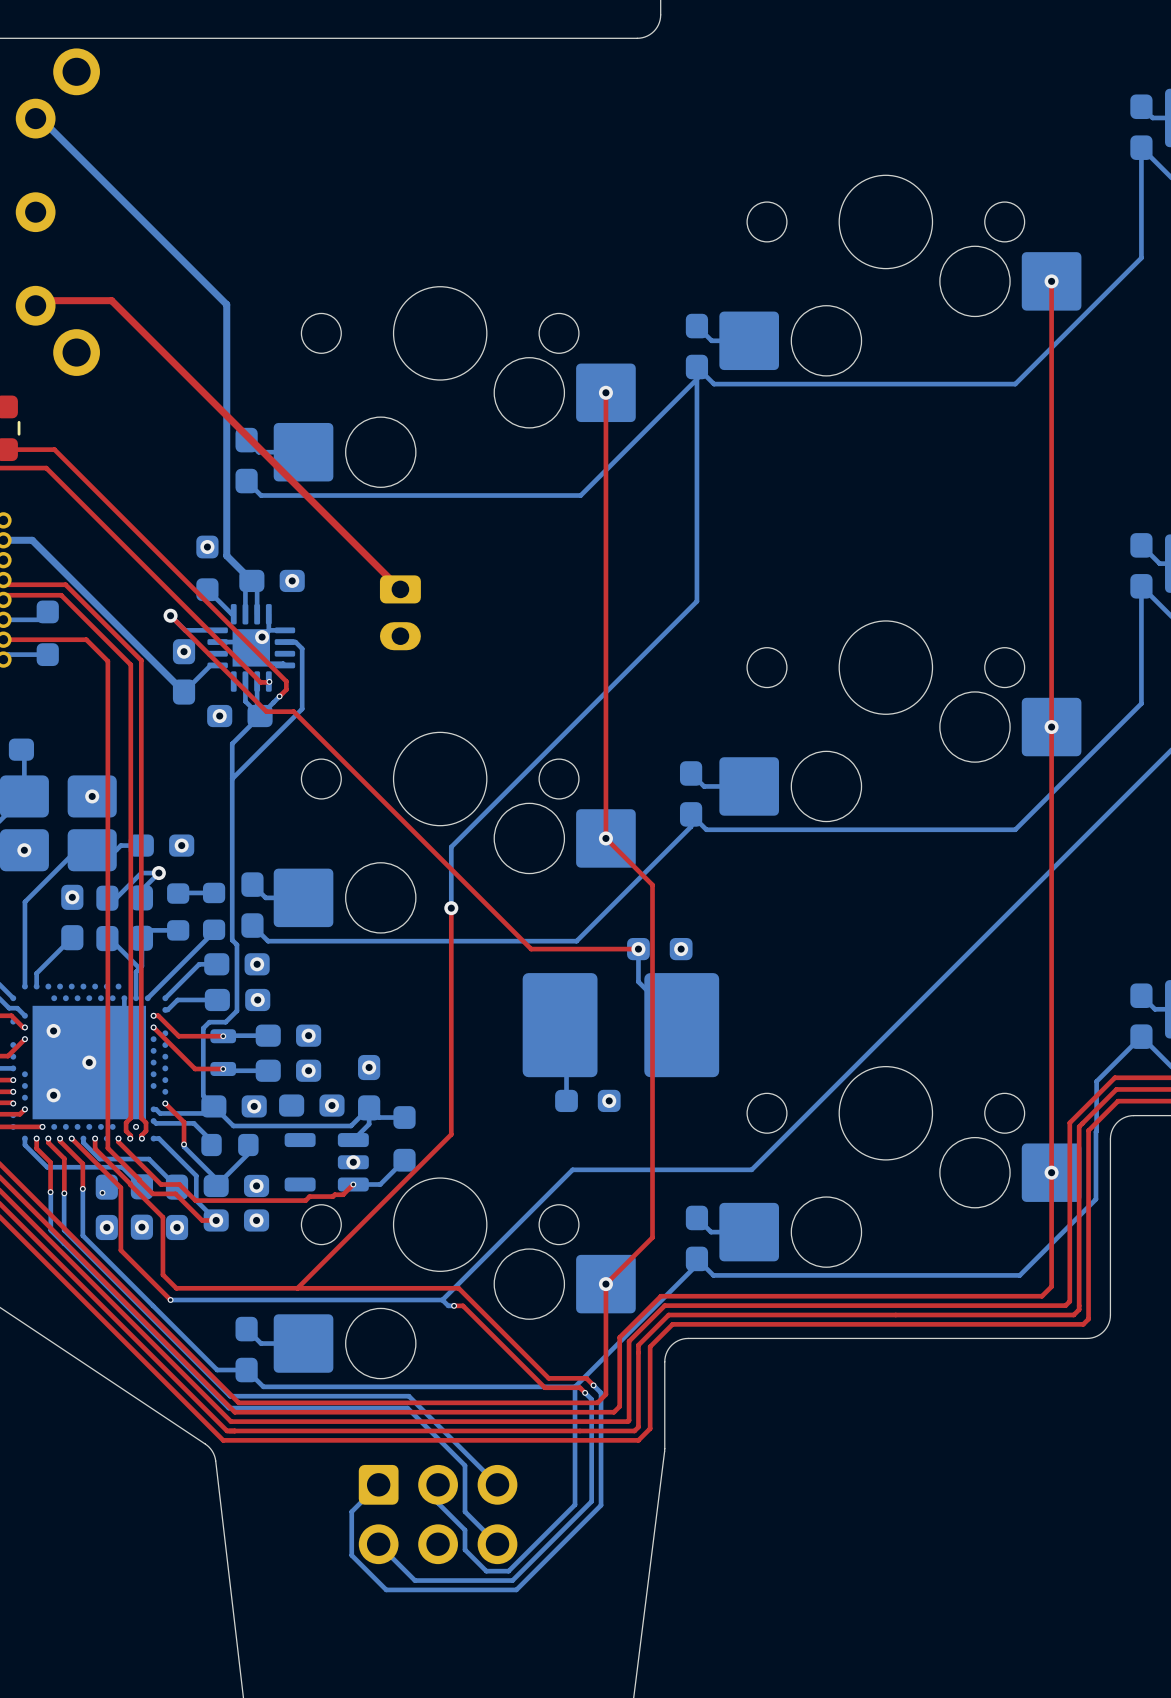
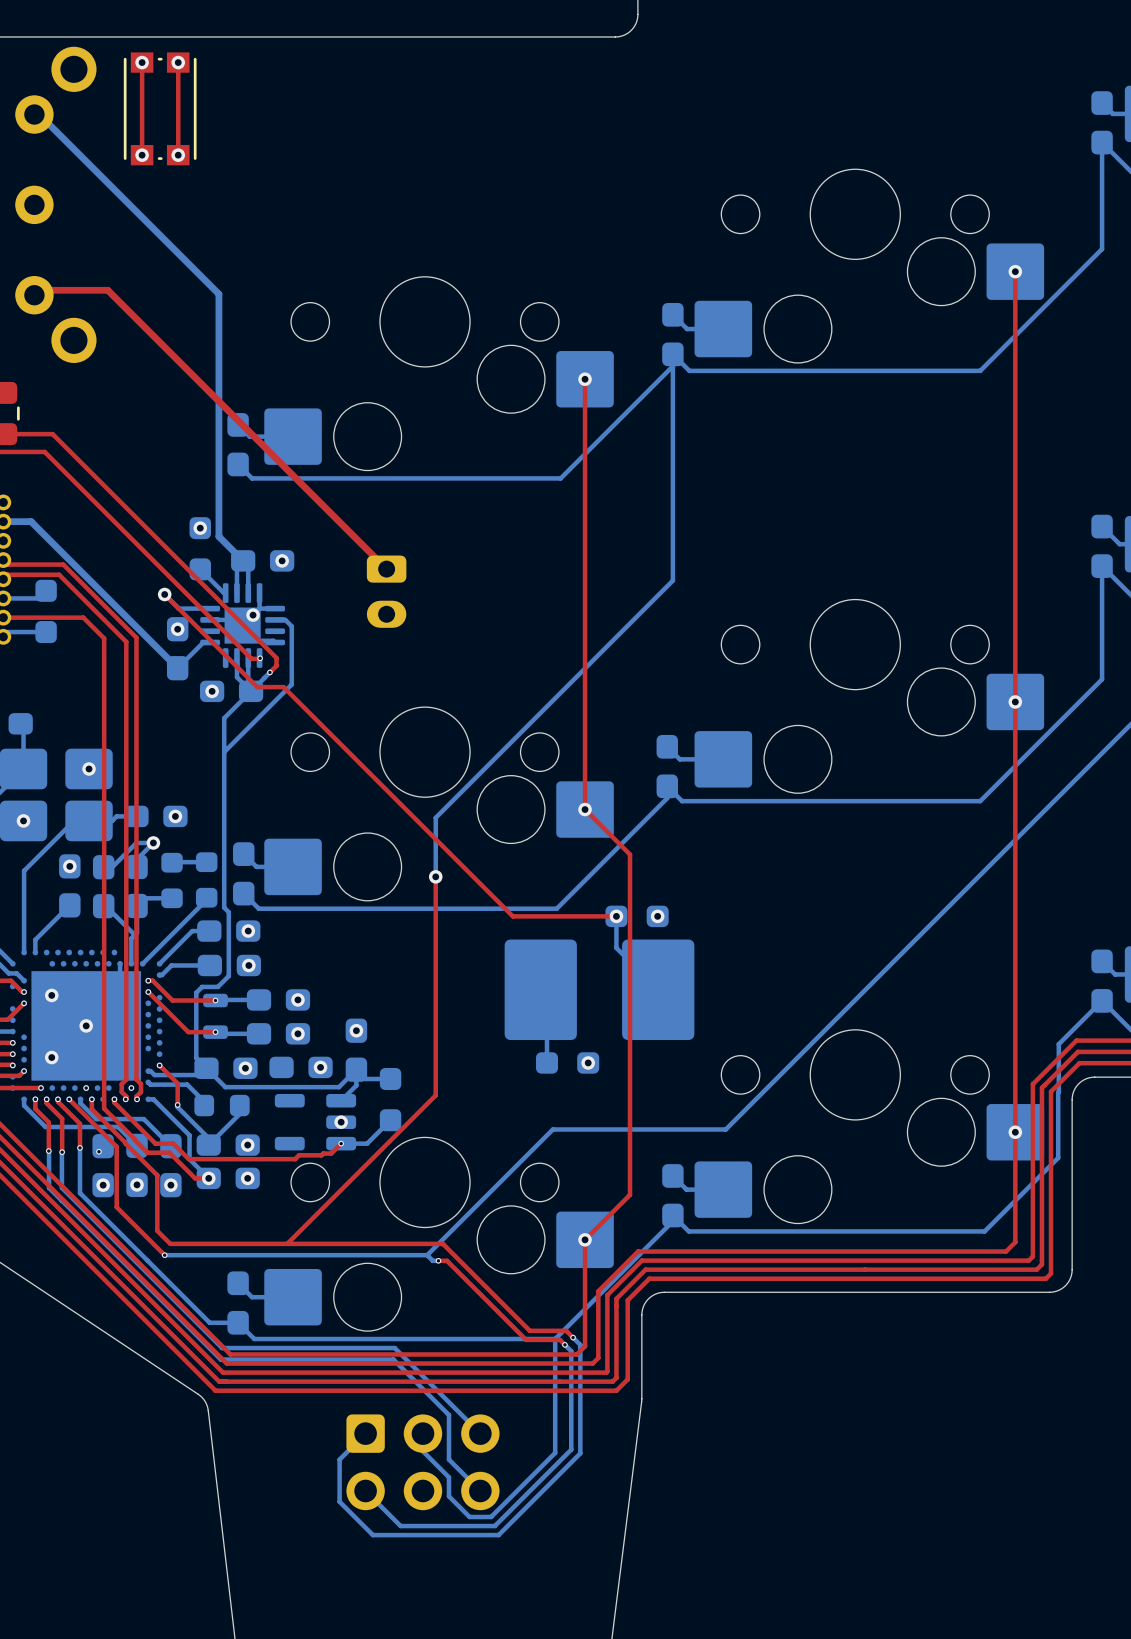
top track: none -> (142, 62) (142, 155)
via: none -> (142, 62)
top track: none -> (178, 62) (178, 155)
via: none -> (178, 62)
part: none -> (160, 108)
via: none -> (142, 155)
via: none -> (178, 155)
via: none -> (86, 1088)

